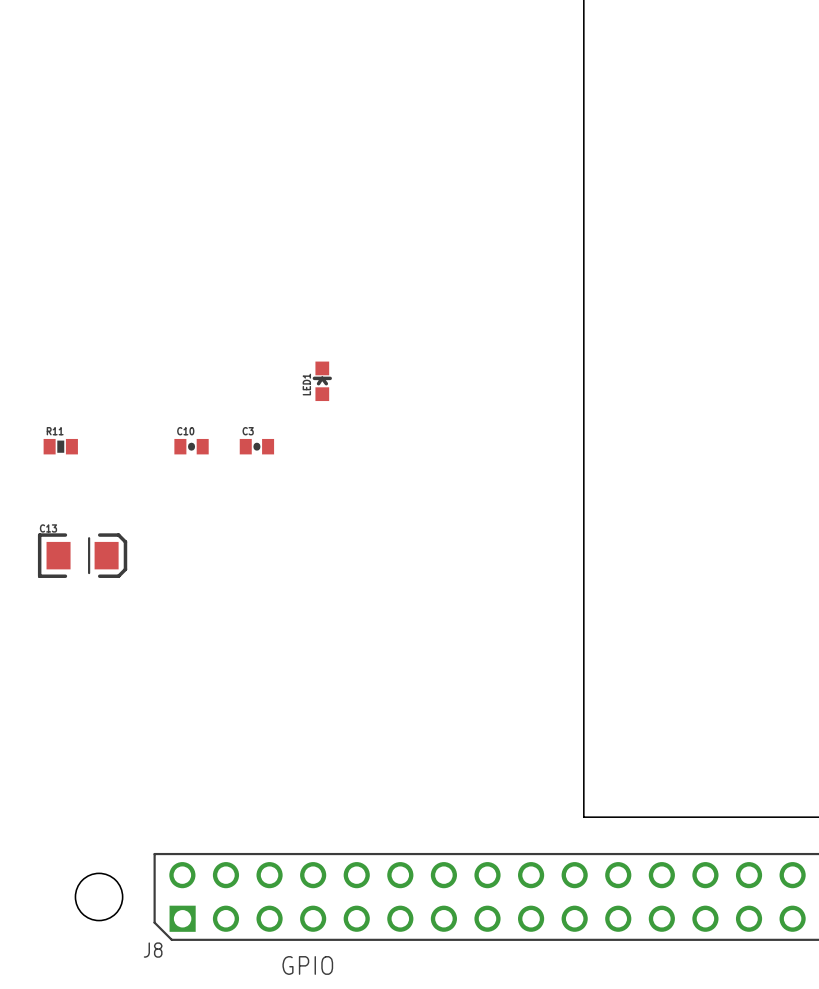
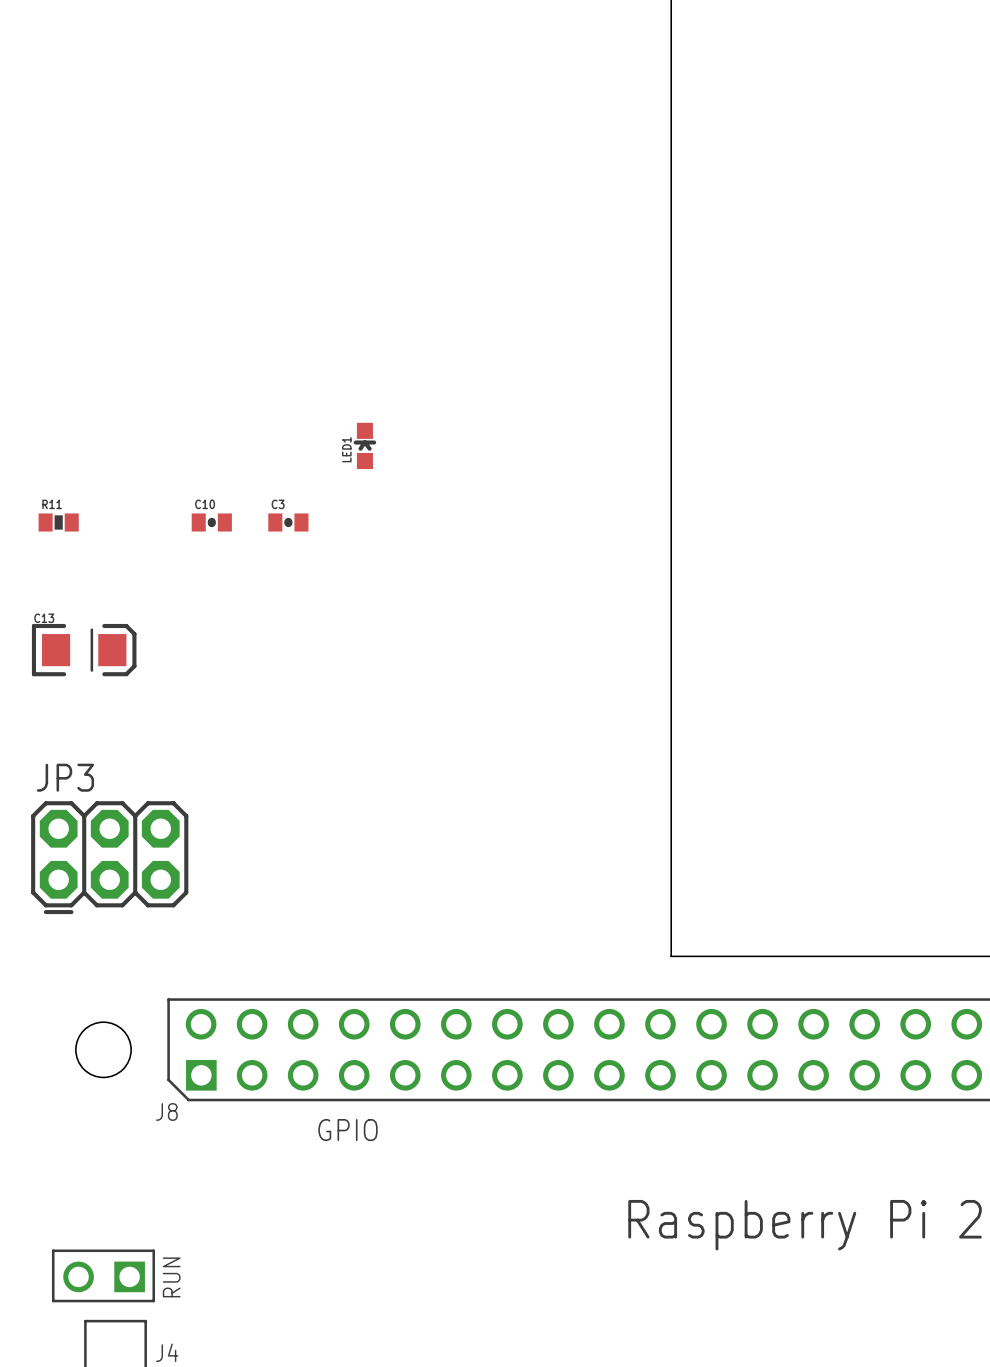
JP3: none -> (109, 857)

